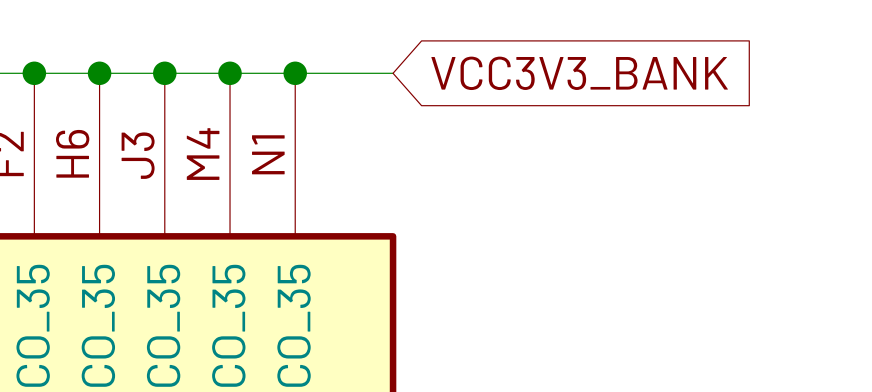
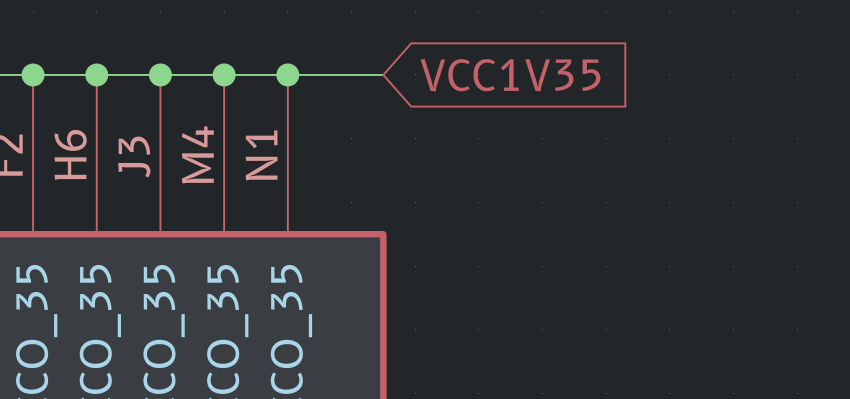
global label: VCC3V3_BANK (579, 73) -> VCC1V35 (510, 75)

